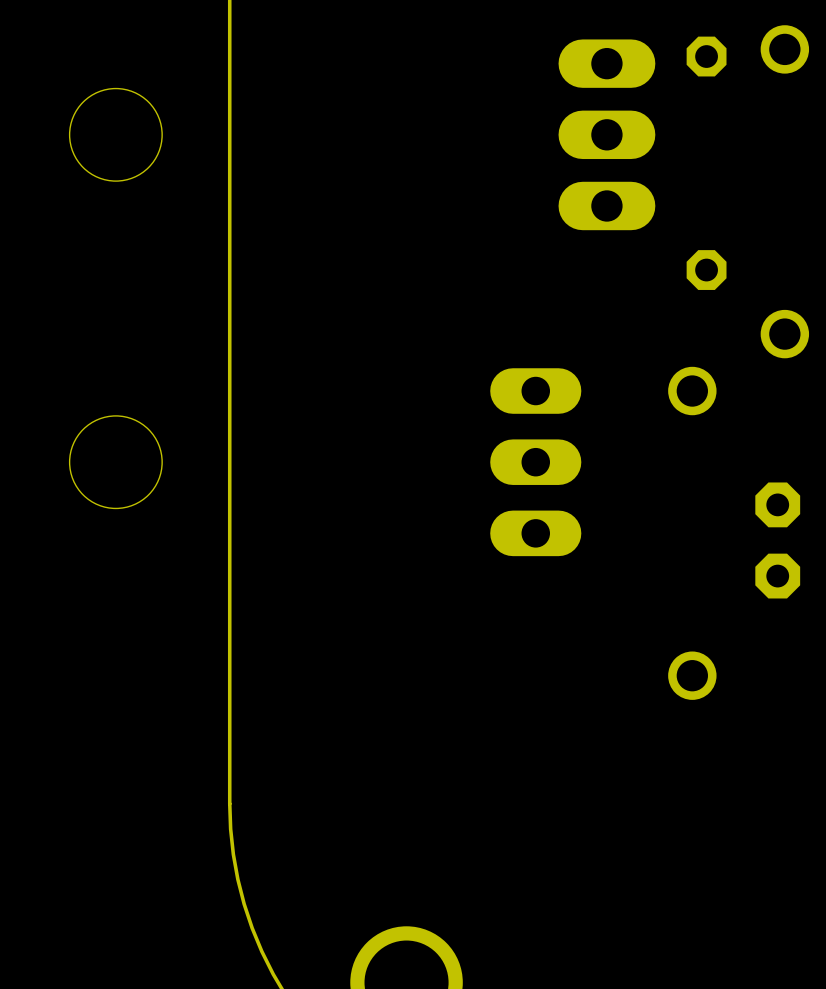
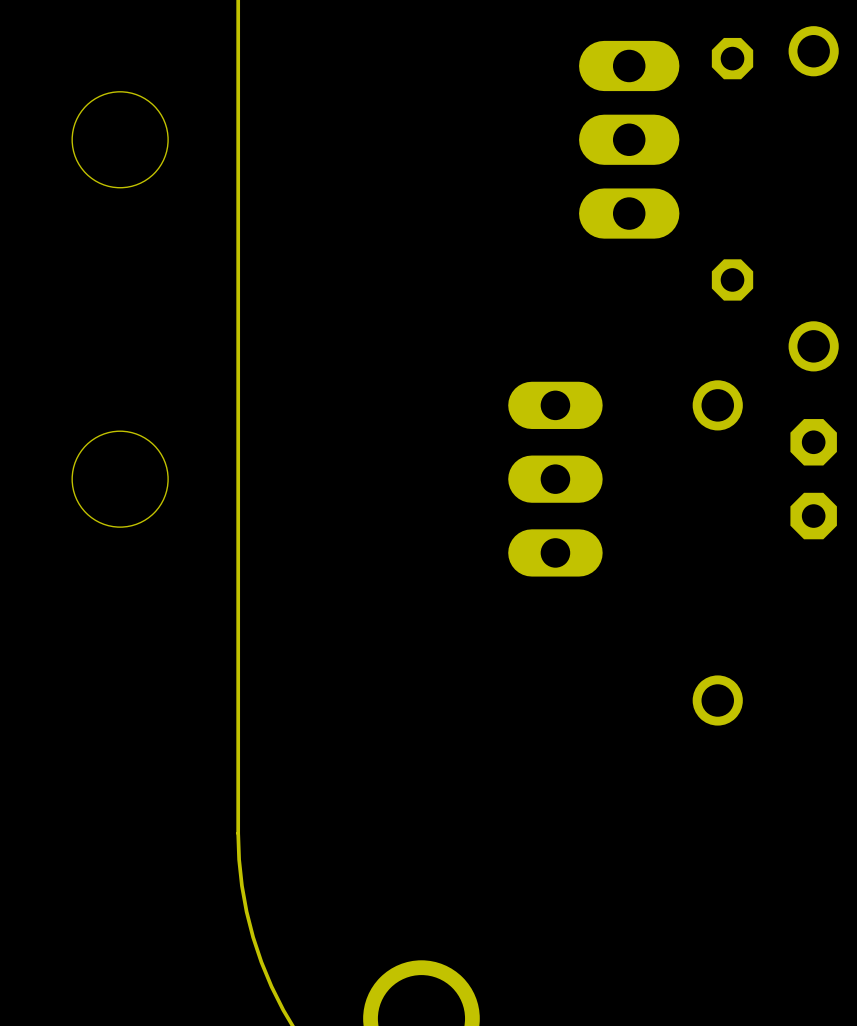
part position: (777, 540) -> (813, 479)

